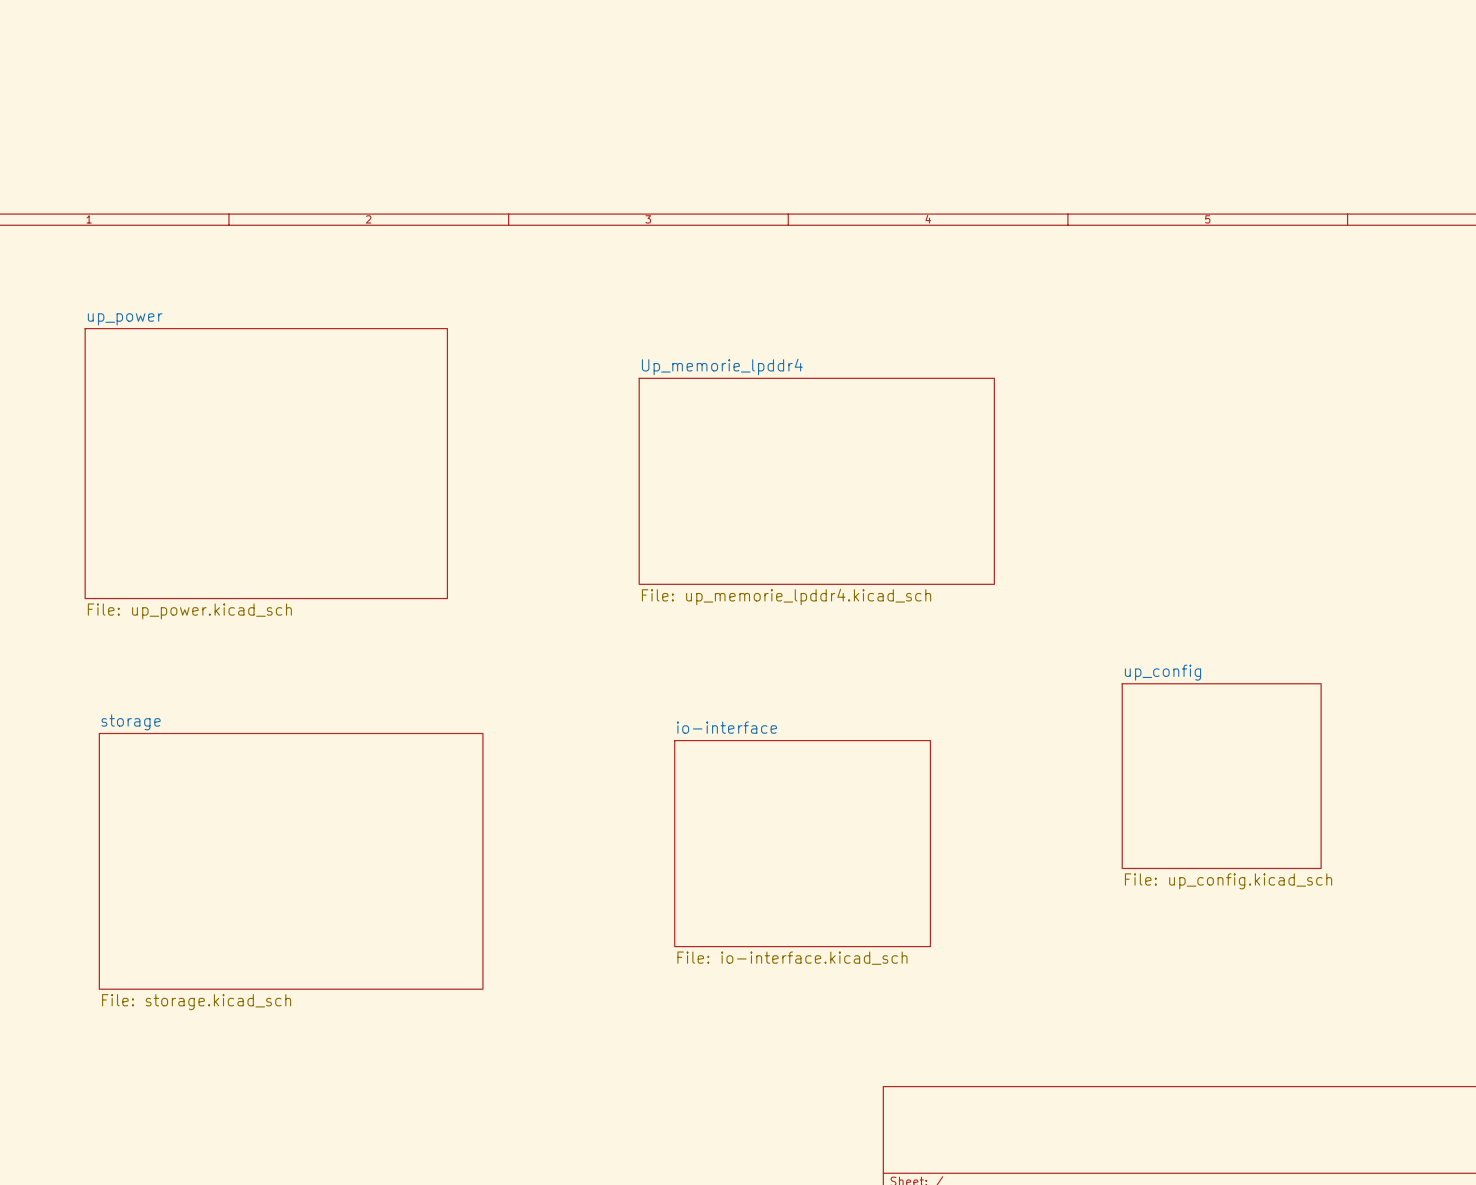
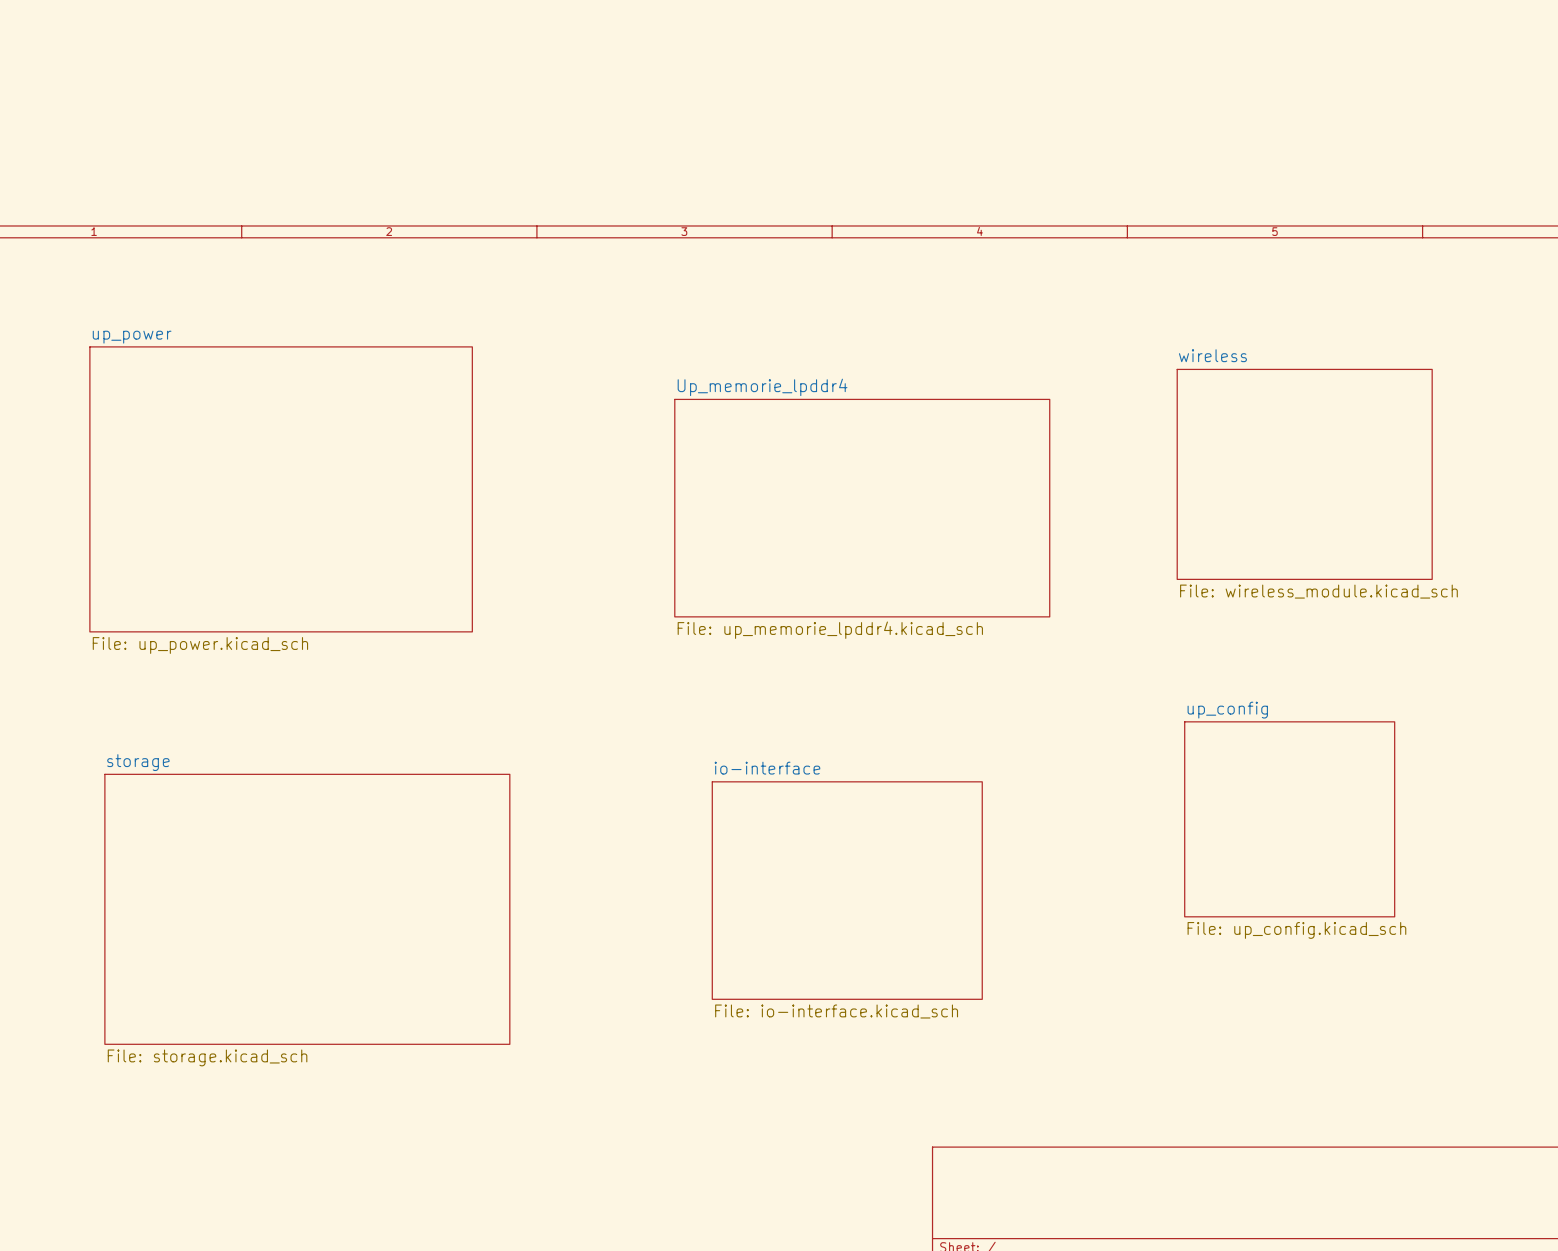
sheet wireless: none -> File: wireless_module.kicad_sch (1304, 474)

